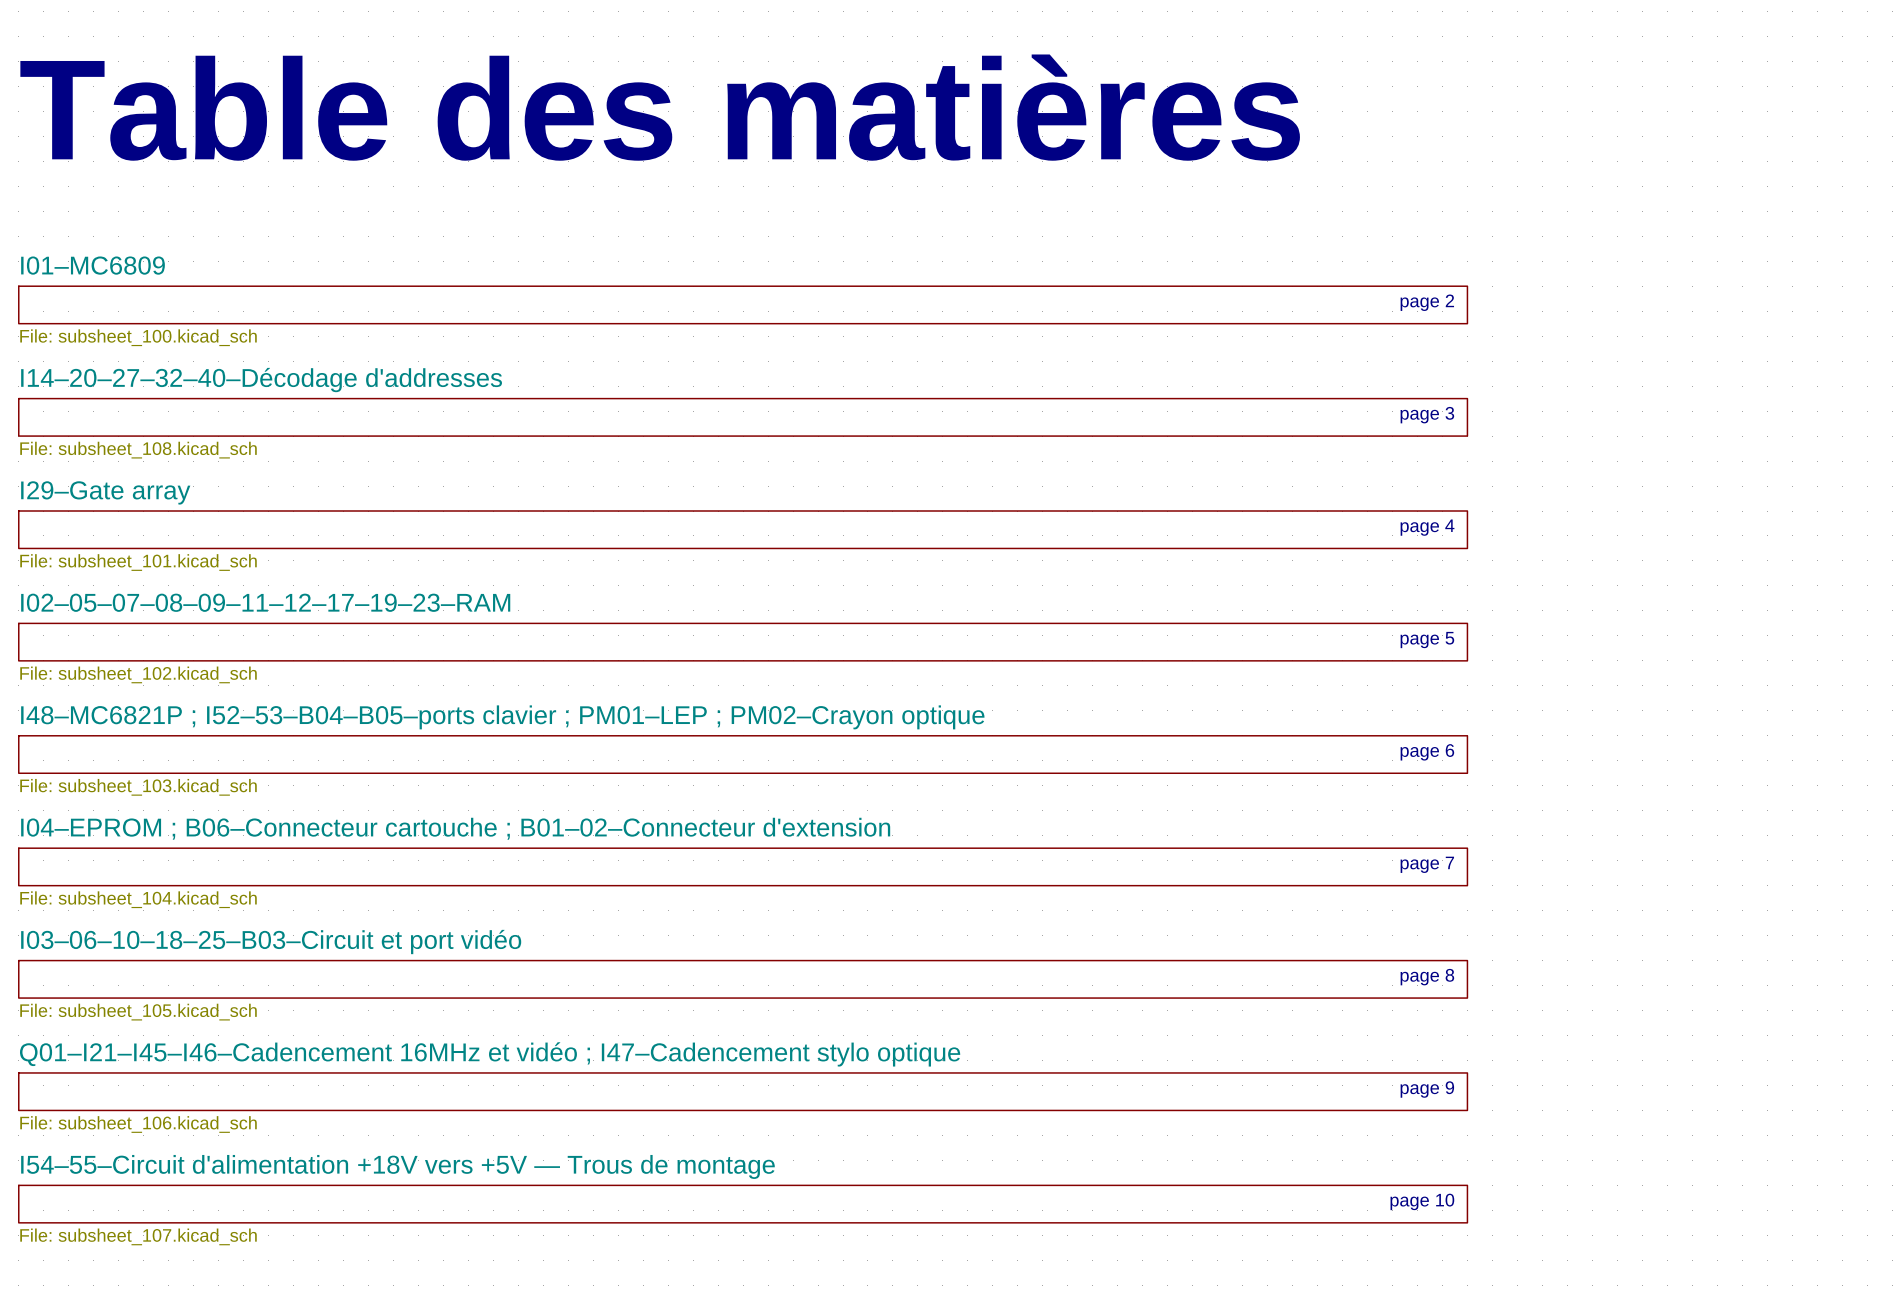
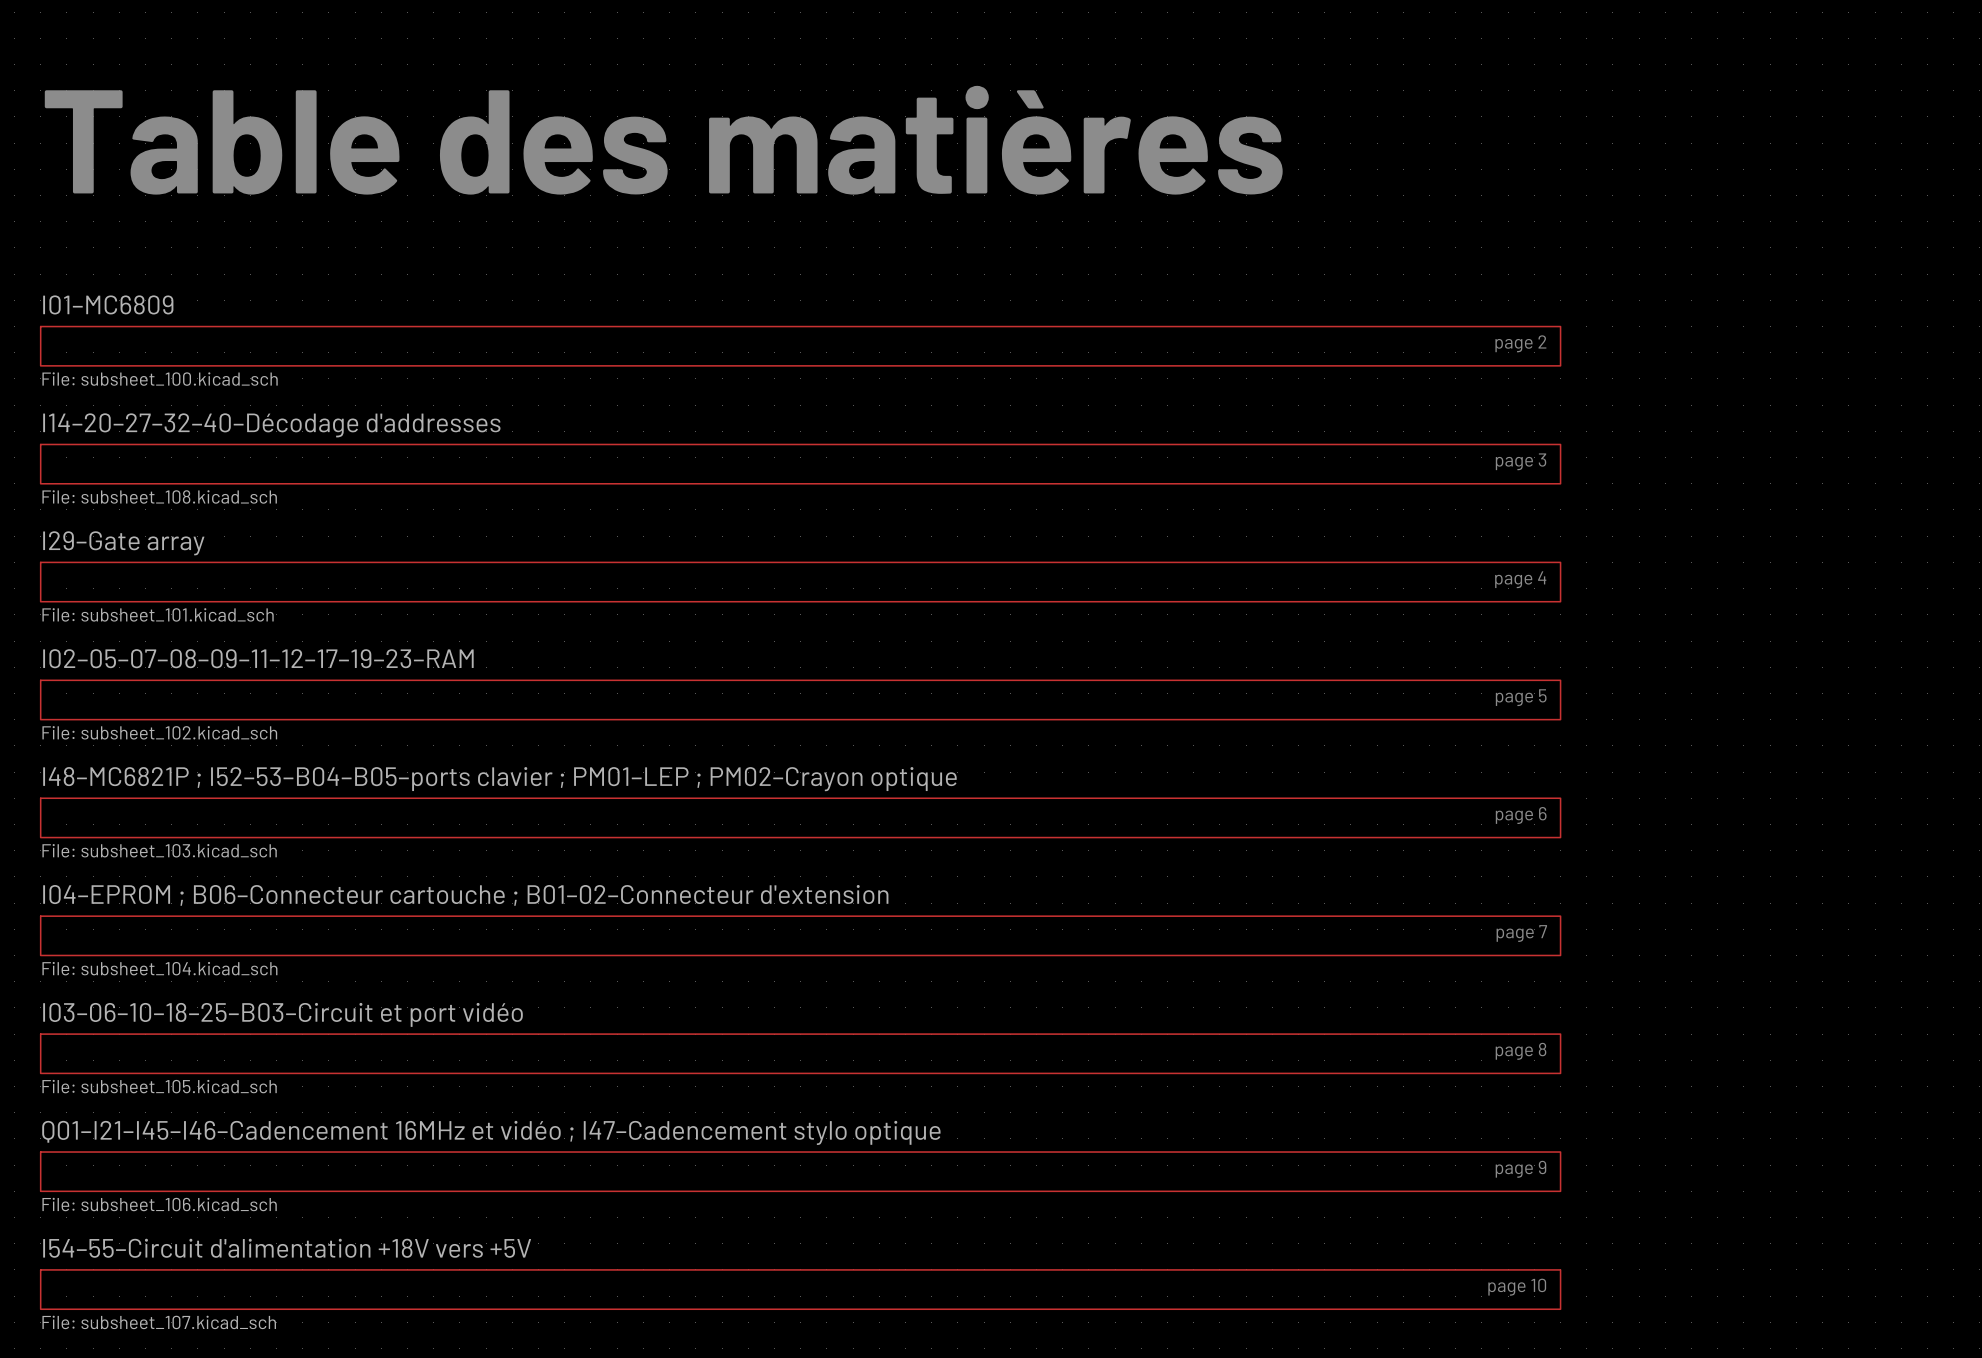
sheet I54–55–Circuit d'alimentation +18V vers +5V — Trous de montage name: I54–55–Circuit d'alimentation +18V vers +5V — Trous de montage (397, 1166) -> I54–55–Circuit d'alimentation +18V vers +5V (287, 1248)

